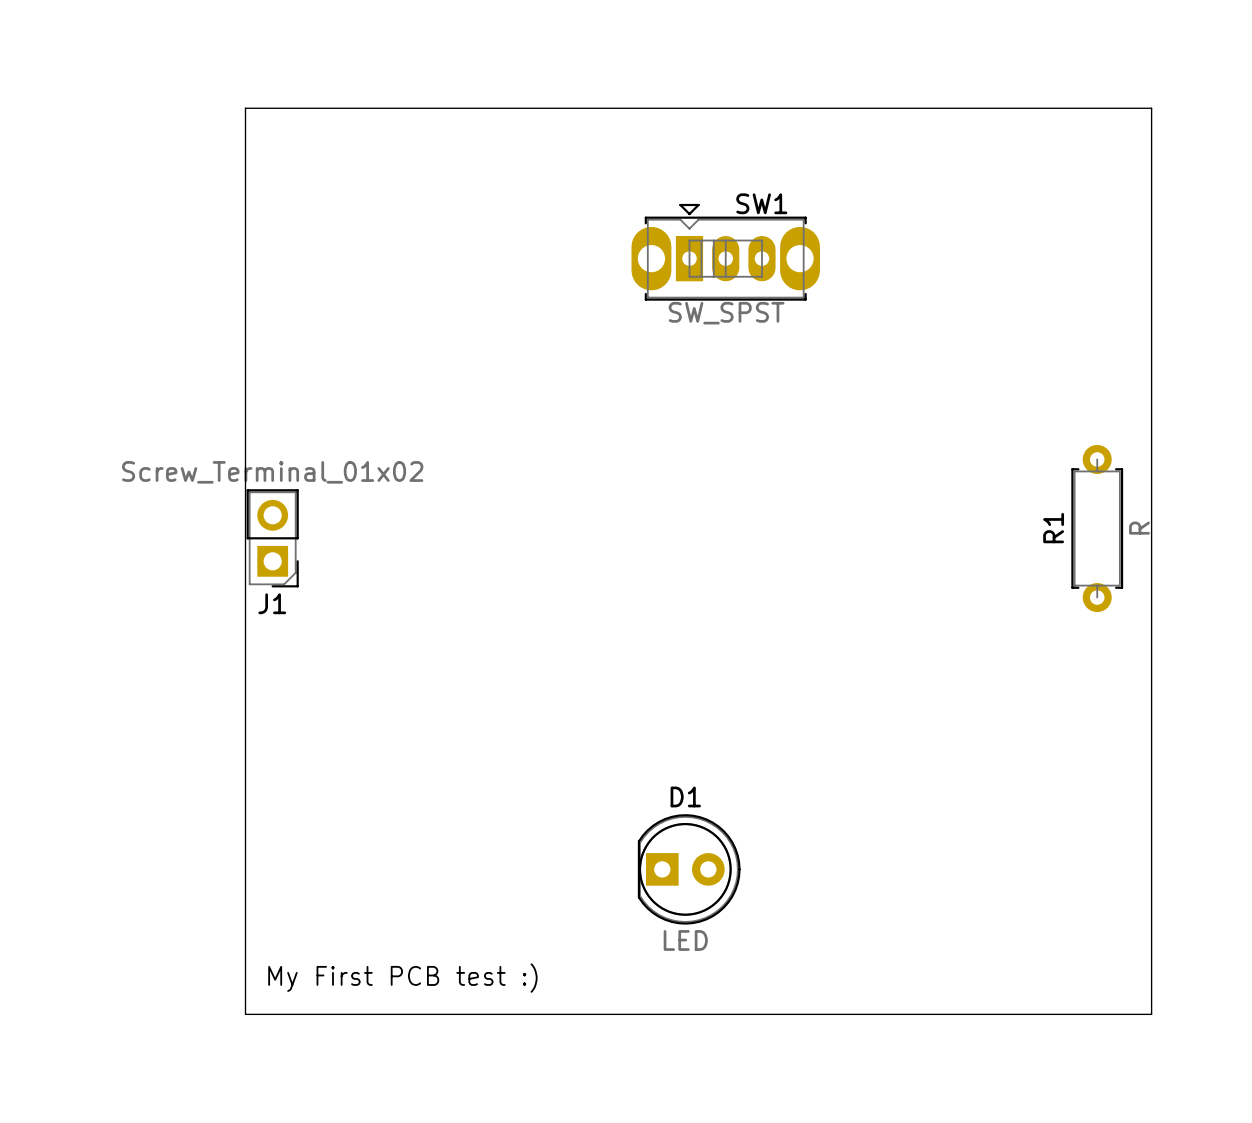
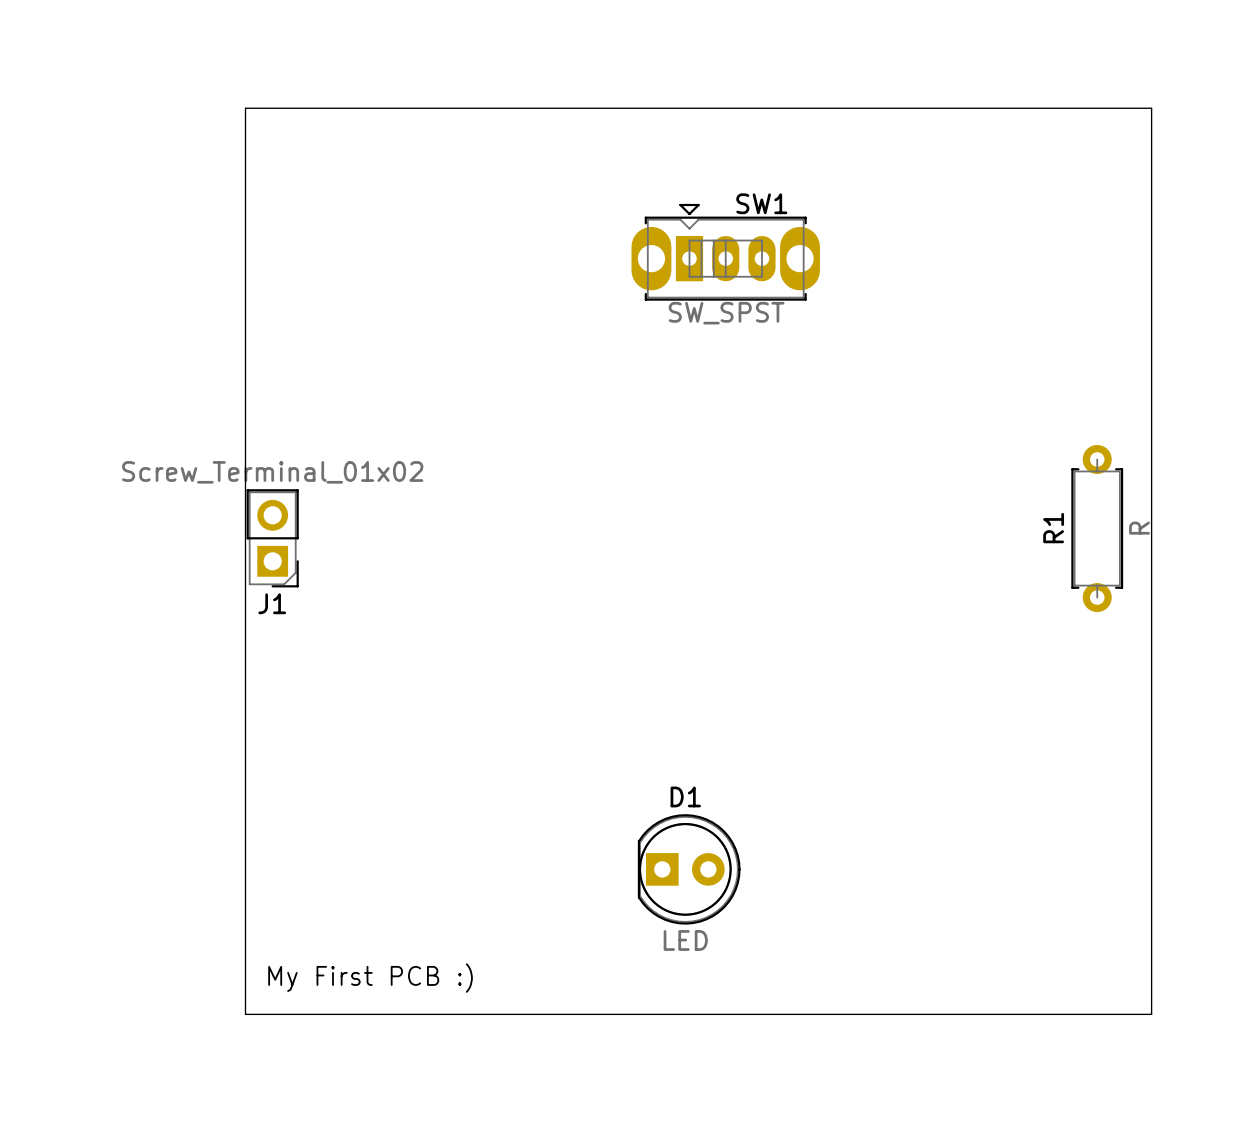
text: My First PCB test :) (402, 978) -> My First PCB :) (370, 978)

